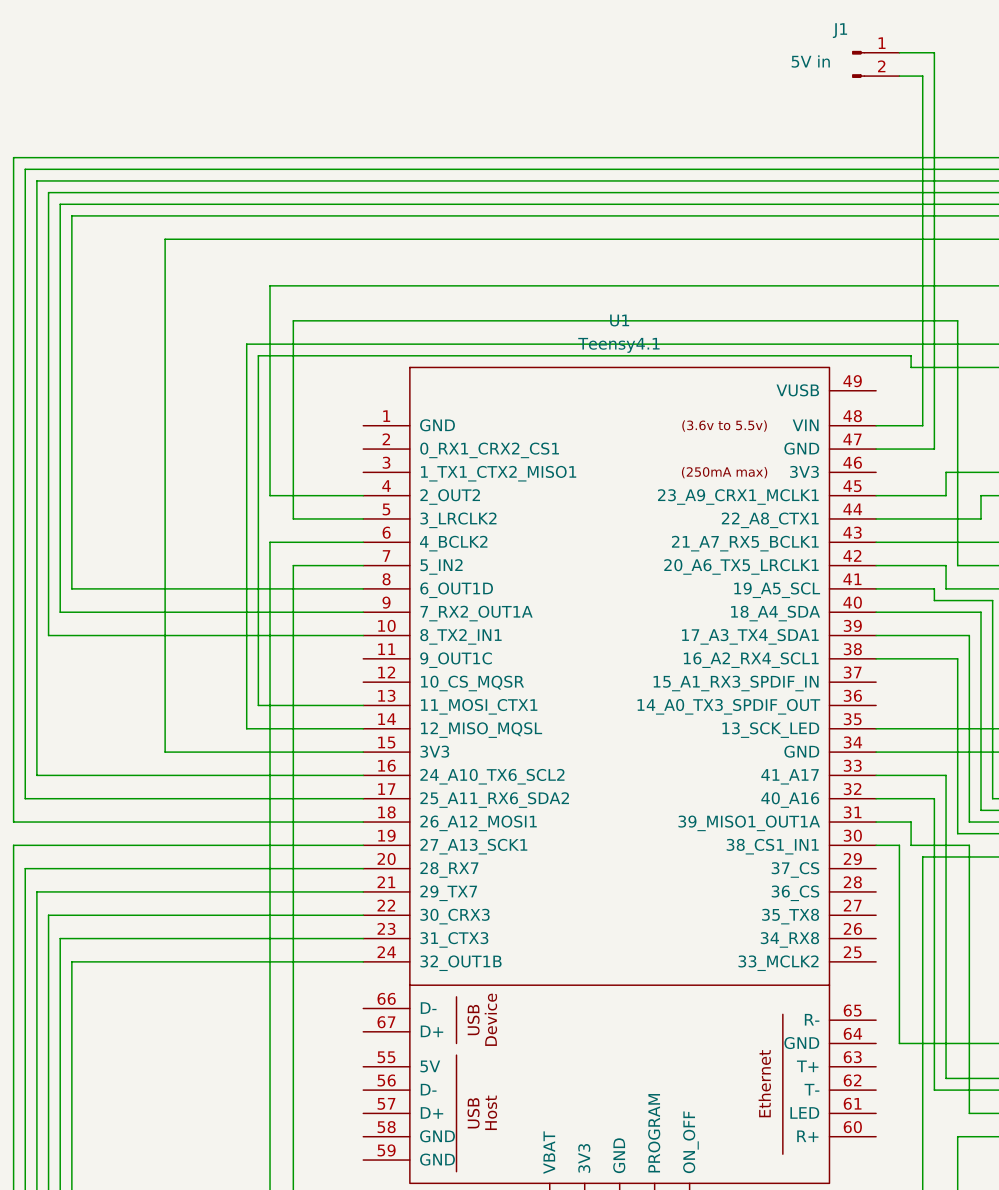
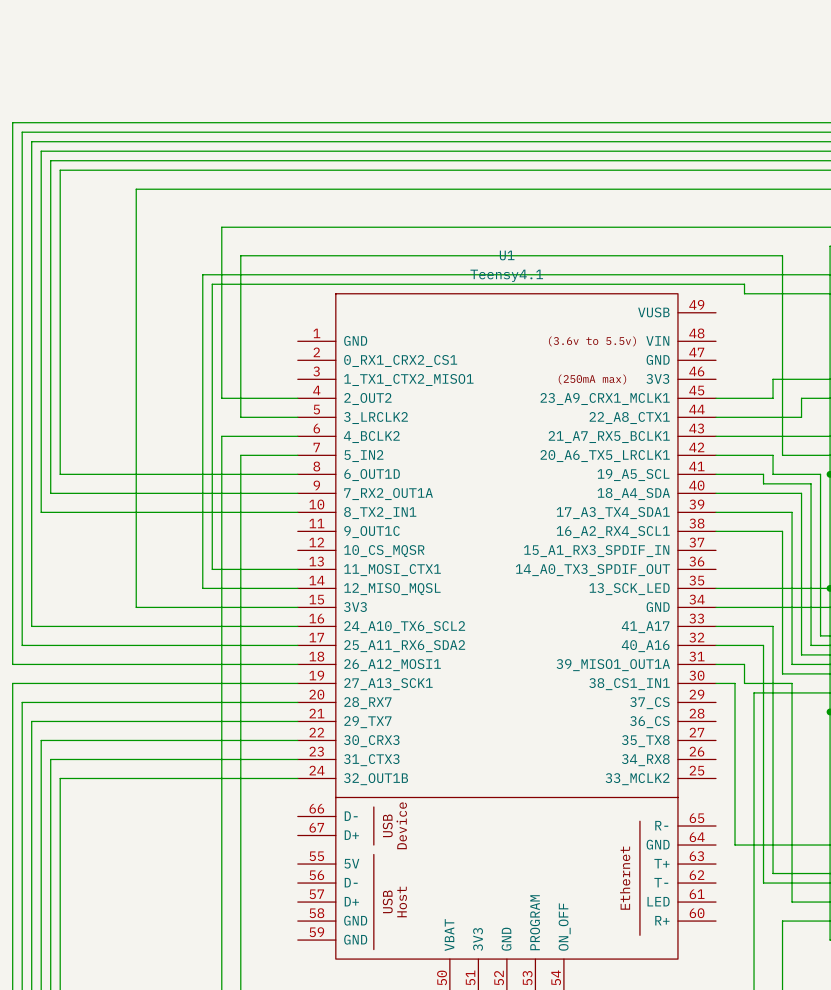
wire: (899, 52) (934, 52) (934, 449) (876, 449) -> none
J1: 5V in (875, 64) -> none
wire: (899, 76) (922, 76) (922, 425) (876, 425) -> none

